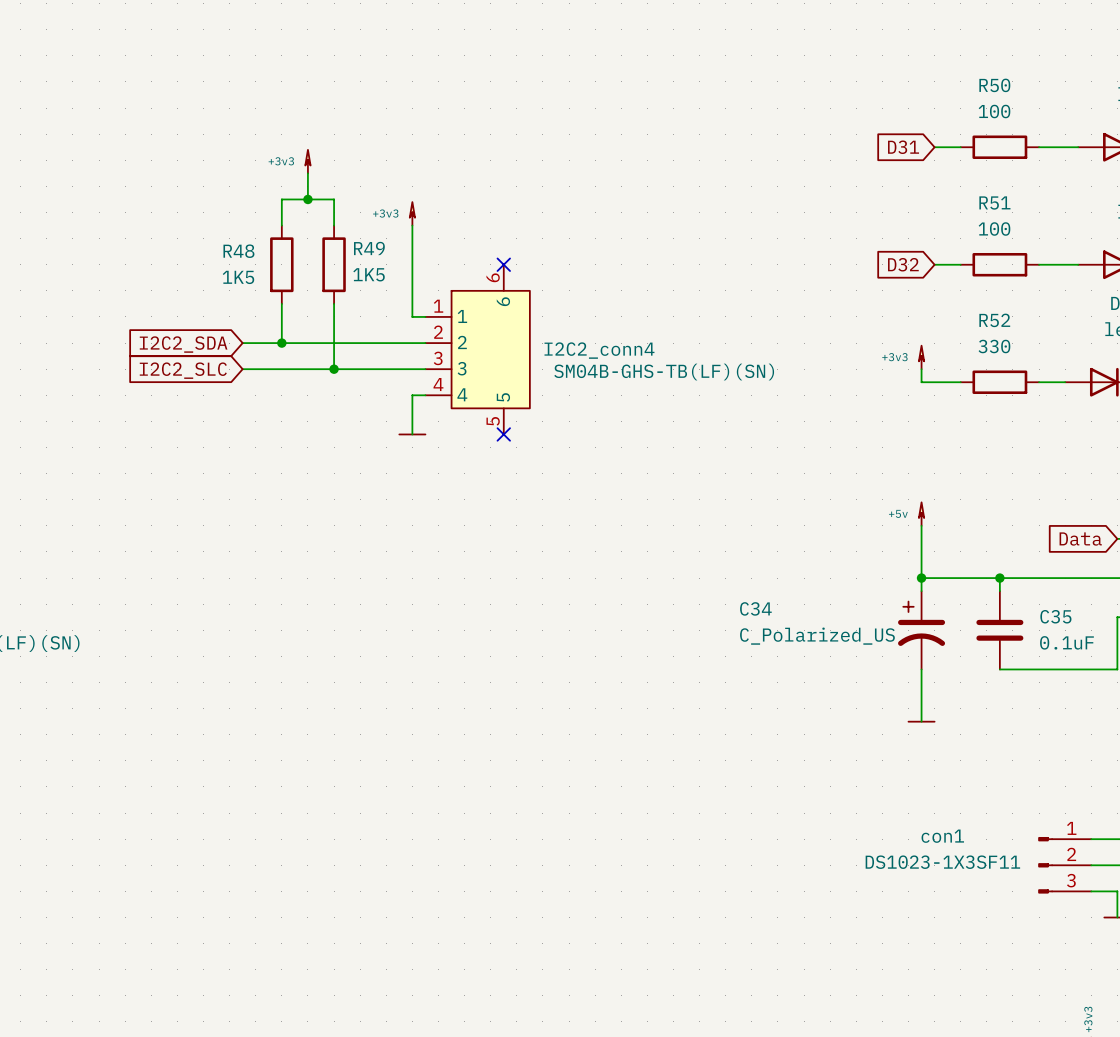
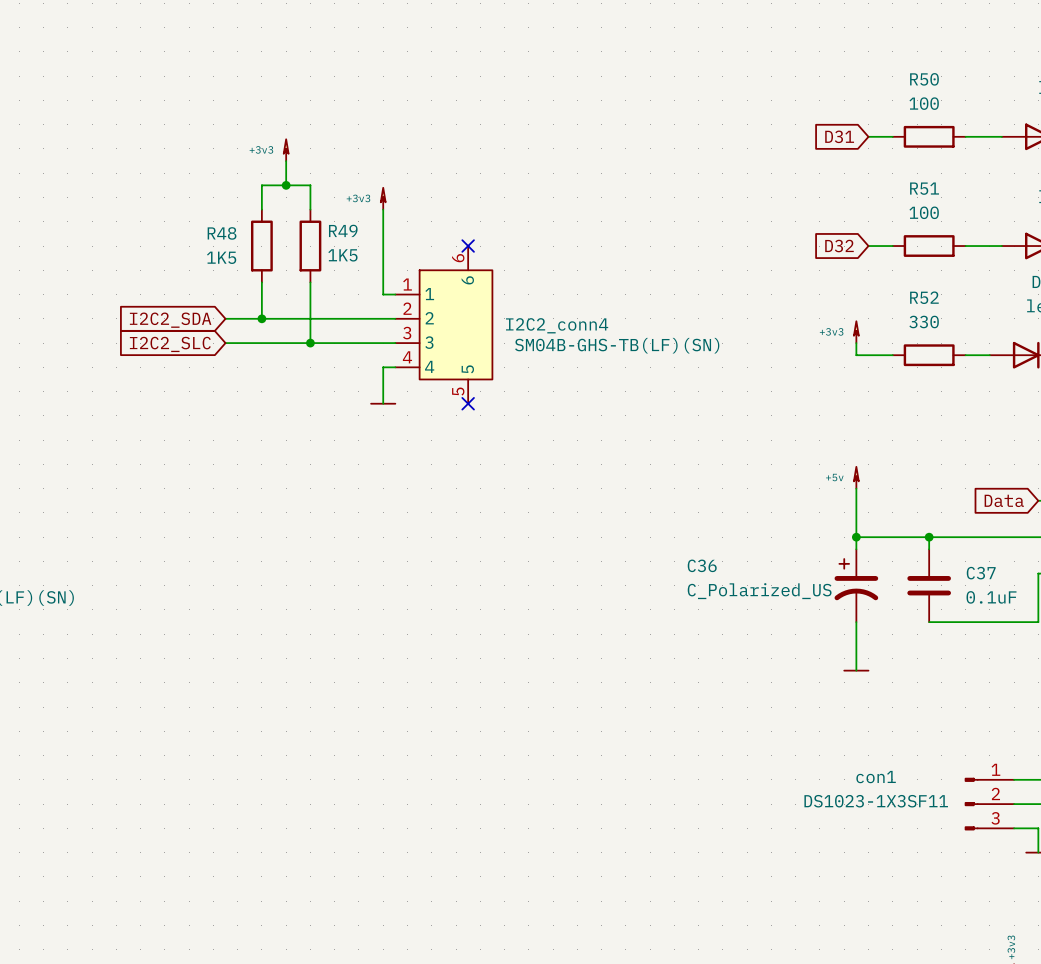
C34 name: C34 (755, 608) -> C36 (702, 565)
C35 name: C35 (1055, 616) -> C37 (981, 573)

